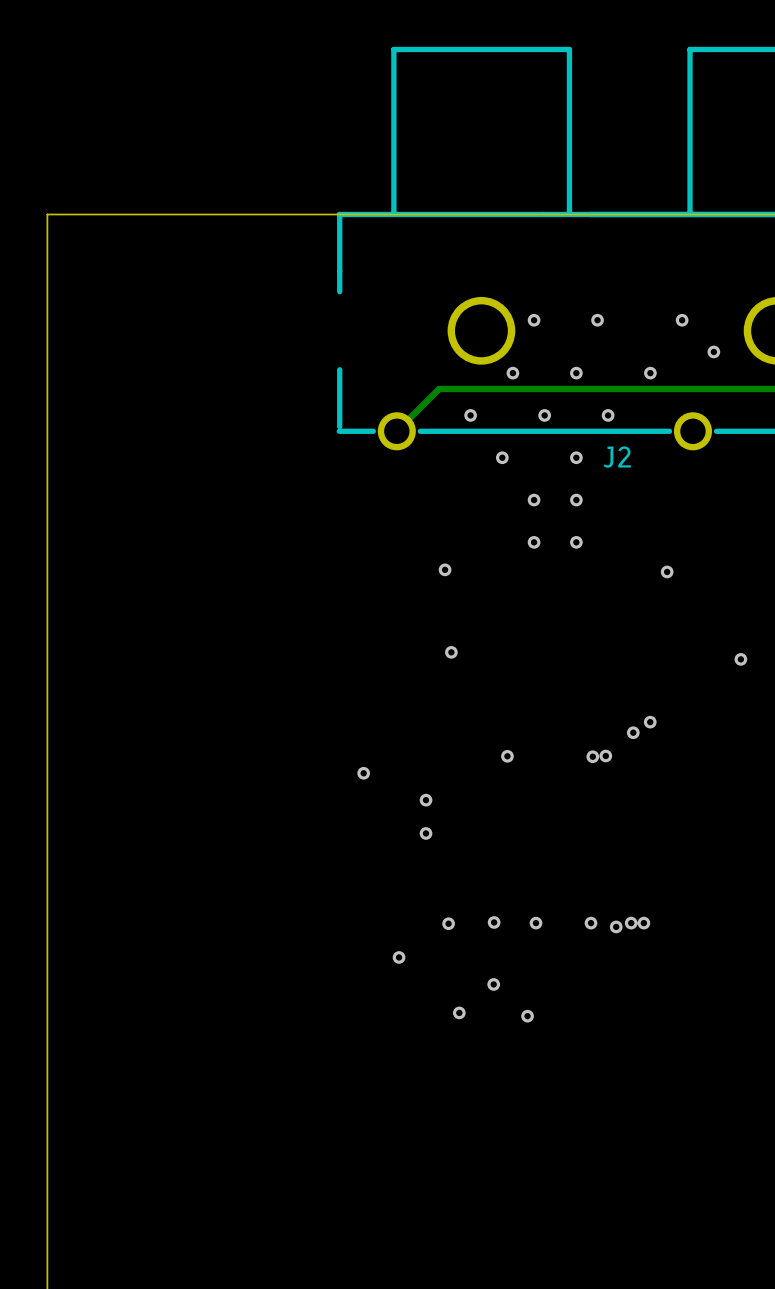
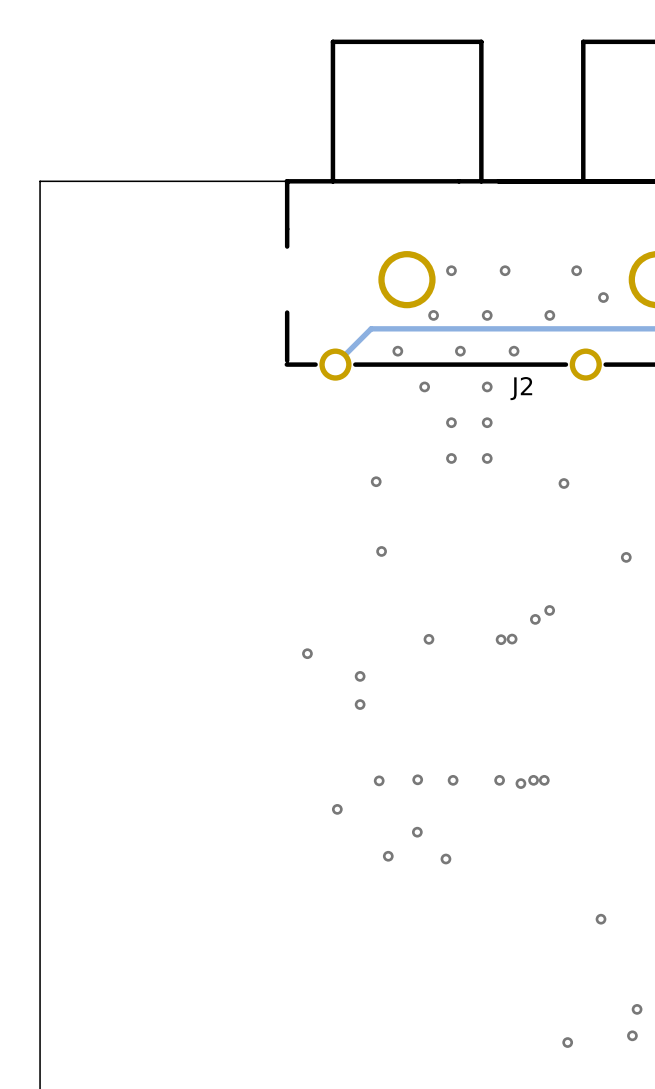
via: none -> (601, 919)
via: none -> (637, 1009)
via: none -> (632, 1035)
via: none -> (567, 1042)

